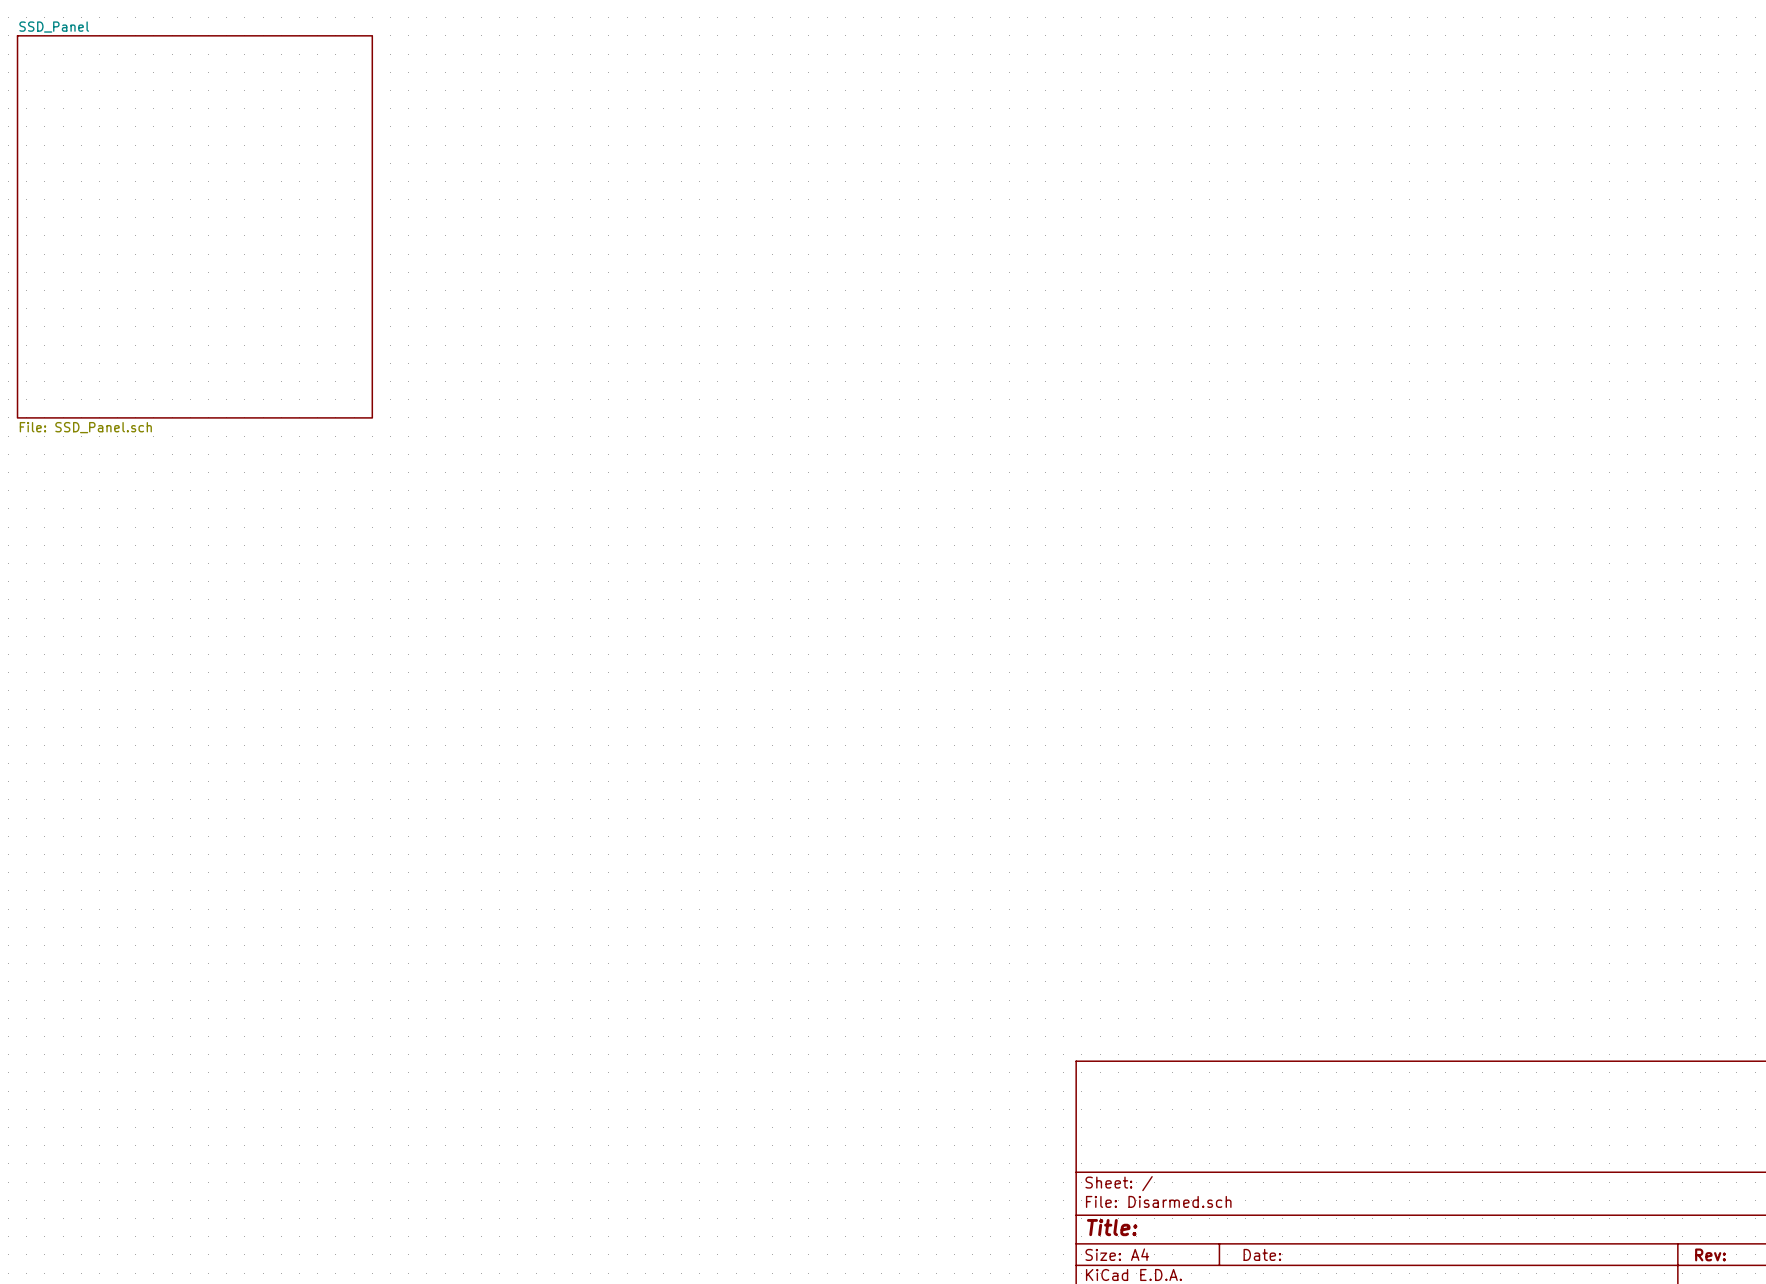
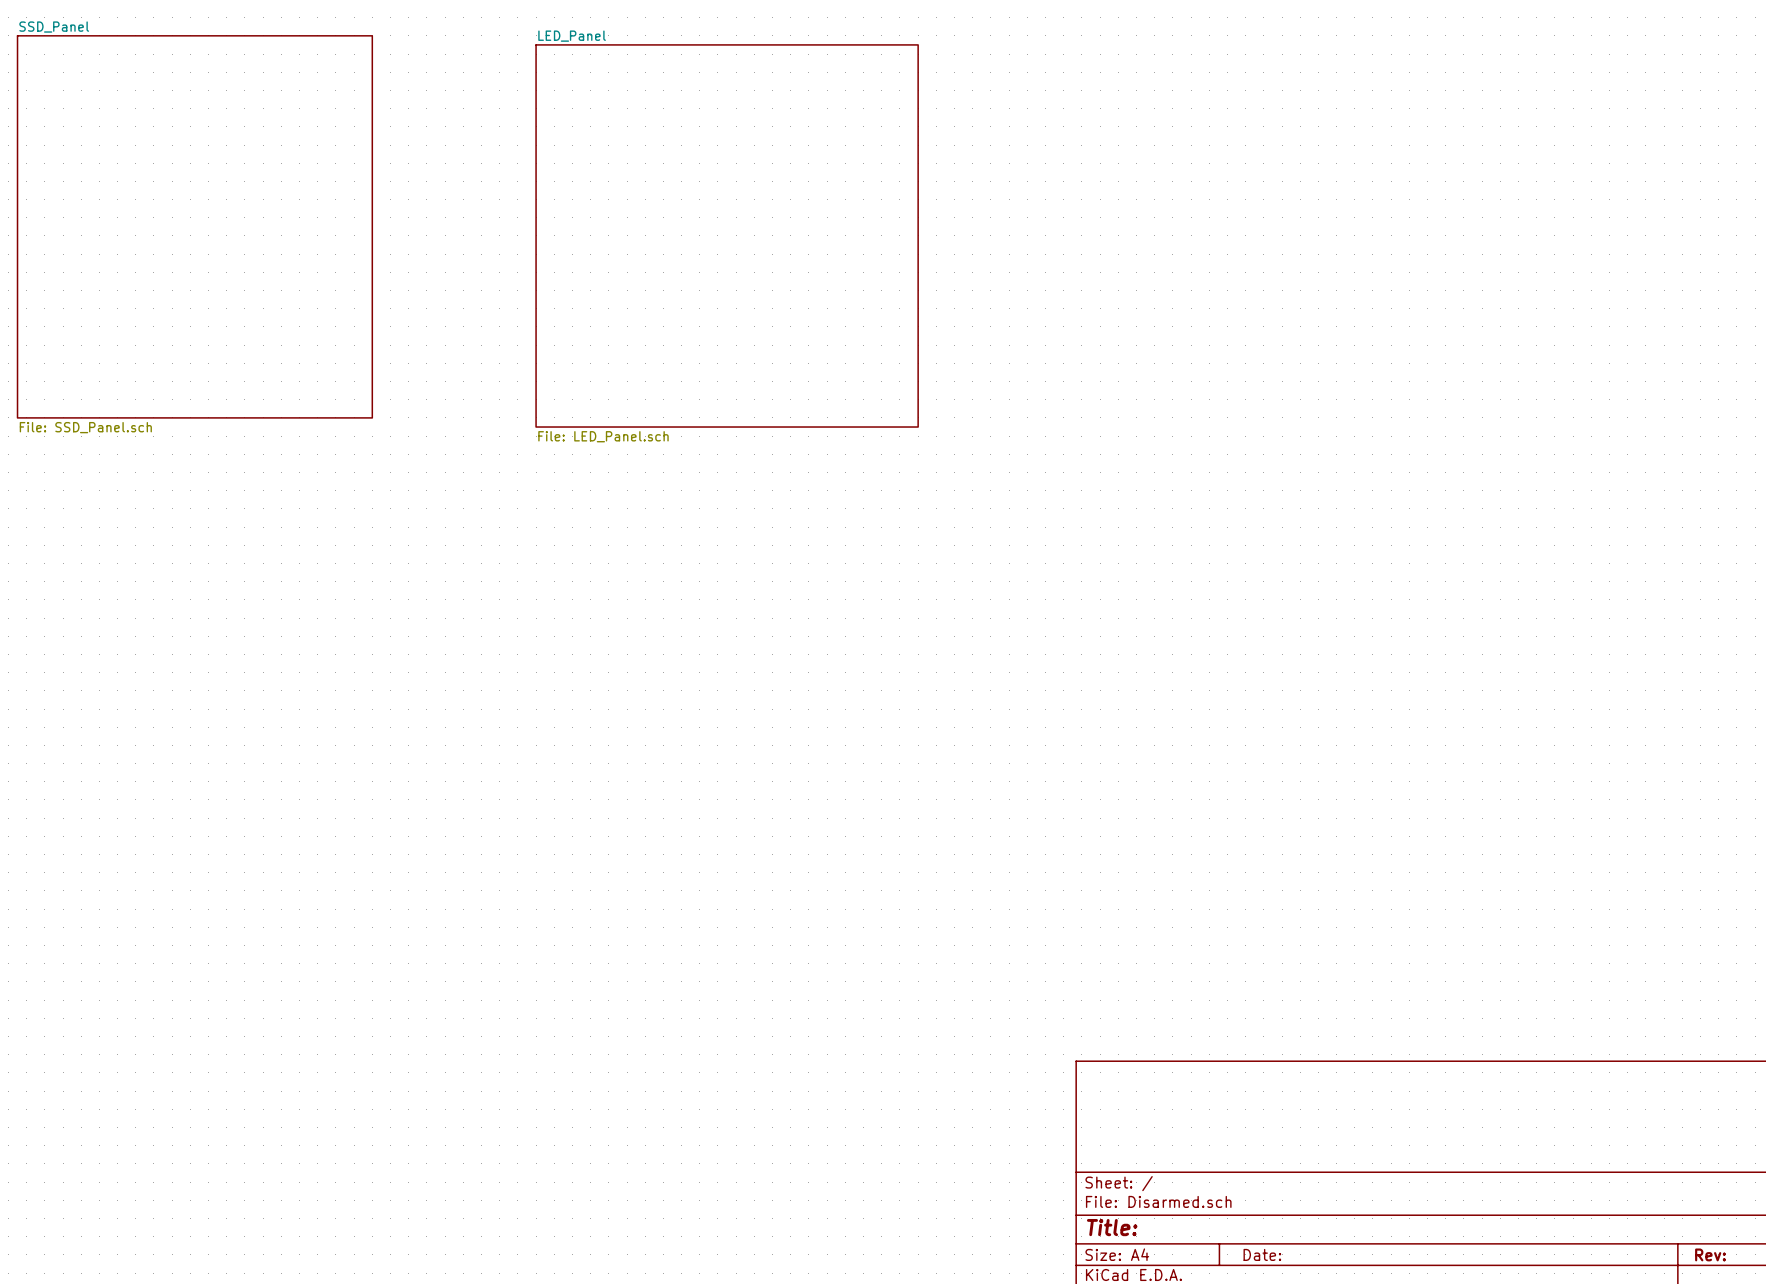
sheet LED_Panel: none -> File: LED_Panel.sch (727, 235)

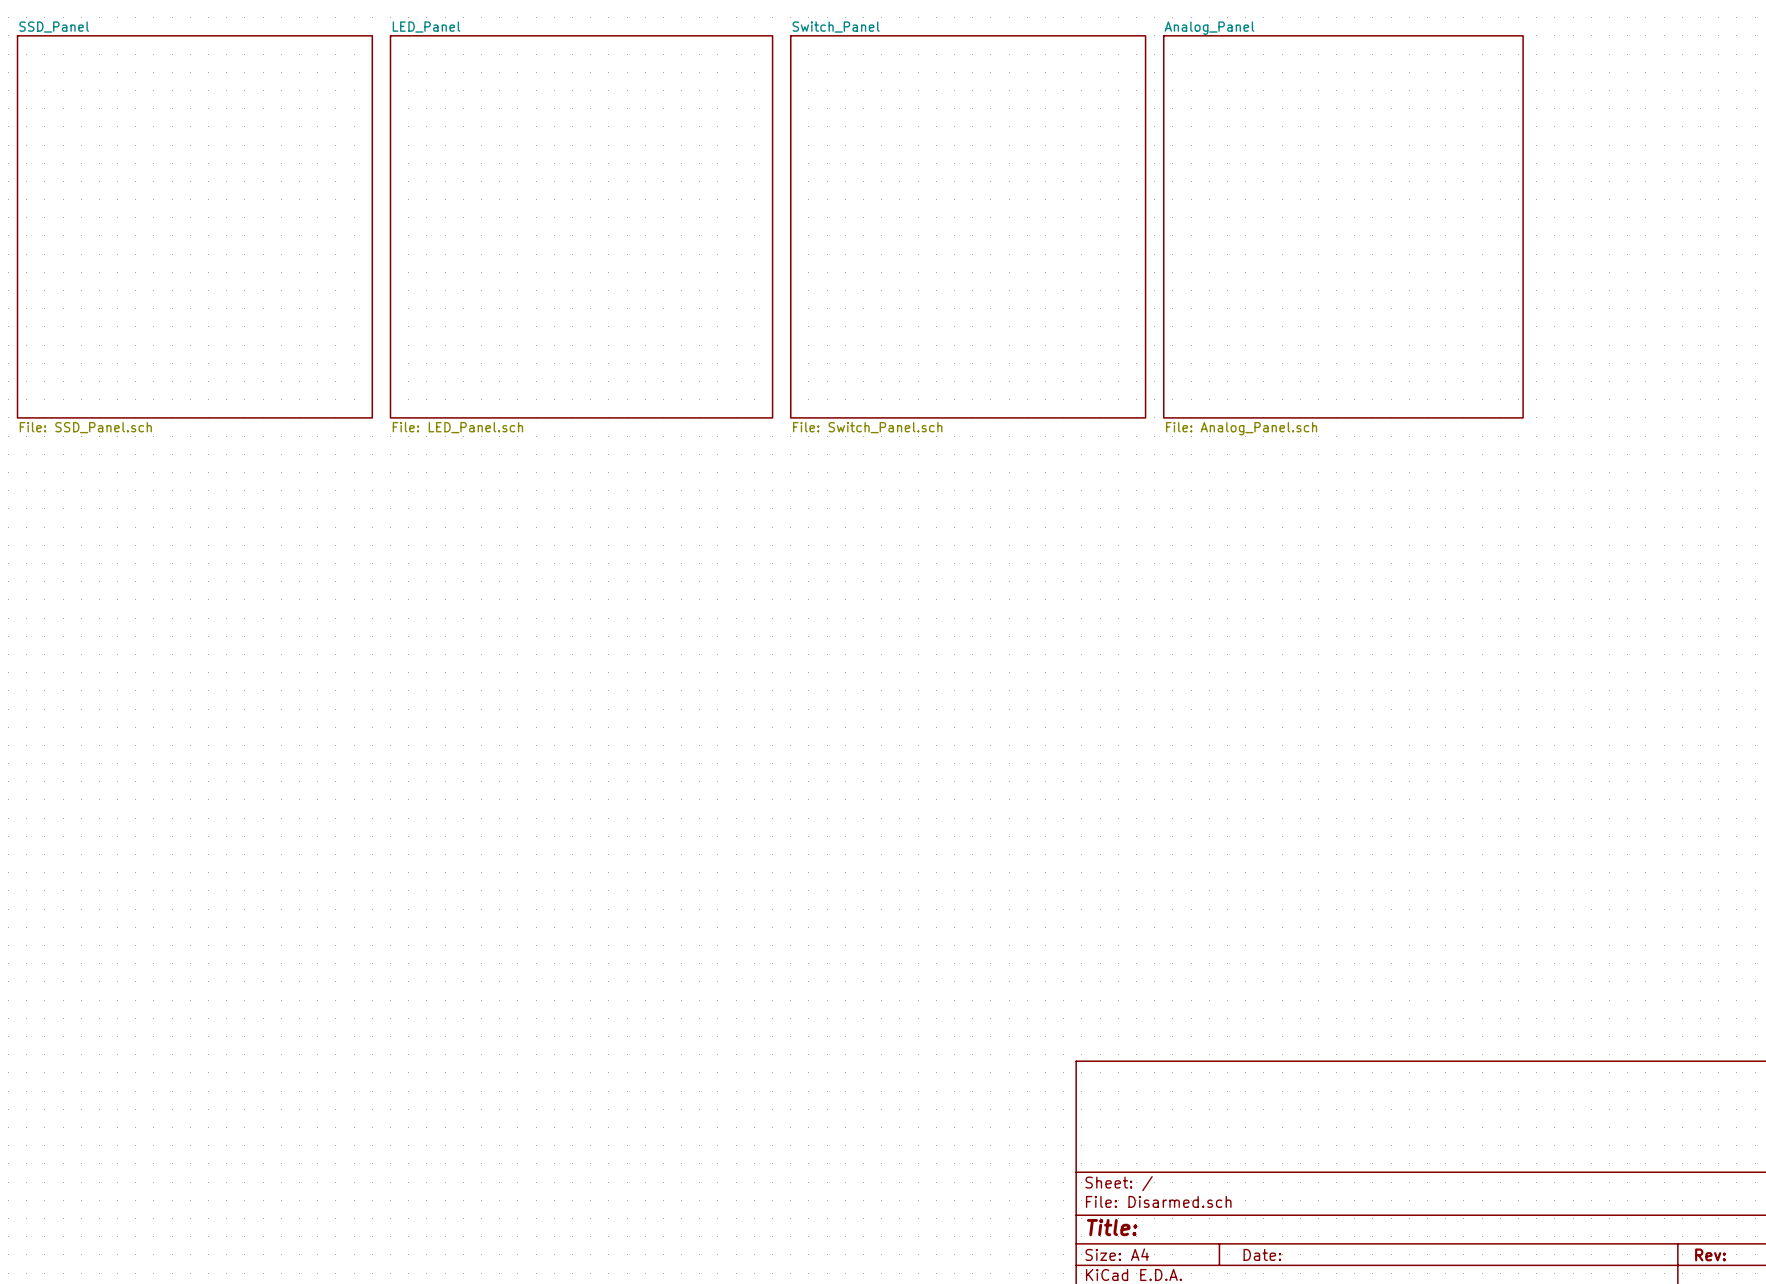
sheet Switch_Panel: none -> File: Switch_Panel.sch (968, 226)
sheet Analog_Panel: none -> File: Analog_Panel.sch (1343, 226)
sheet LED_Panel position: (727, 235) -> (581, 226)

